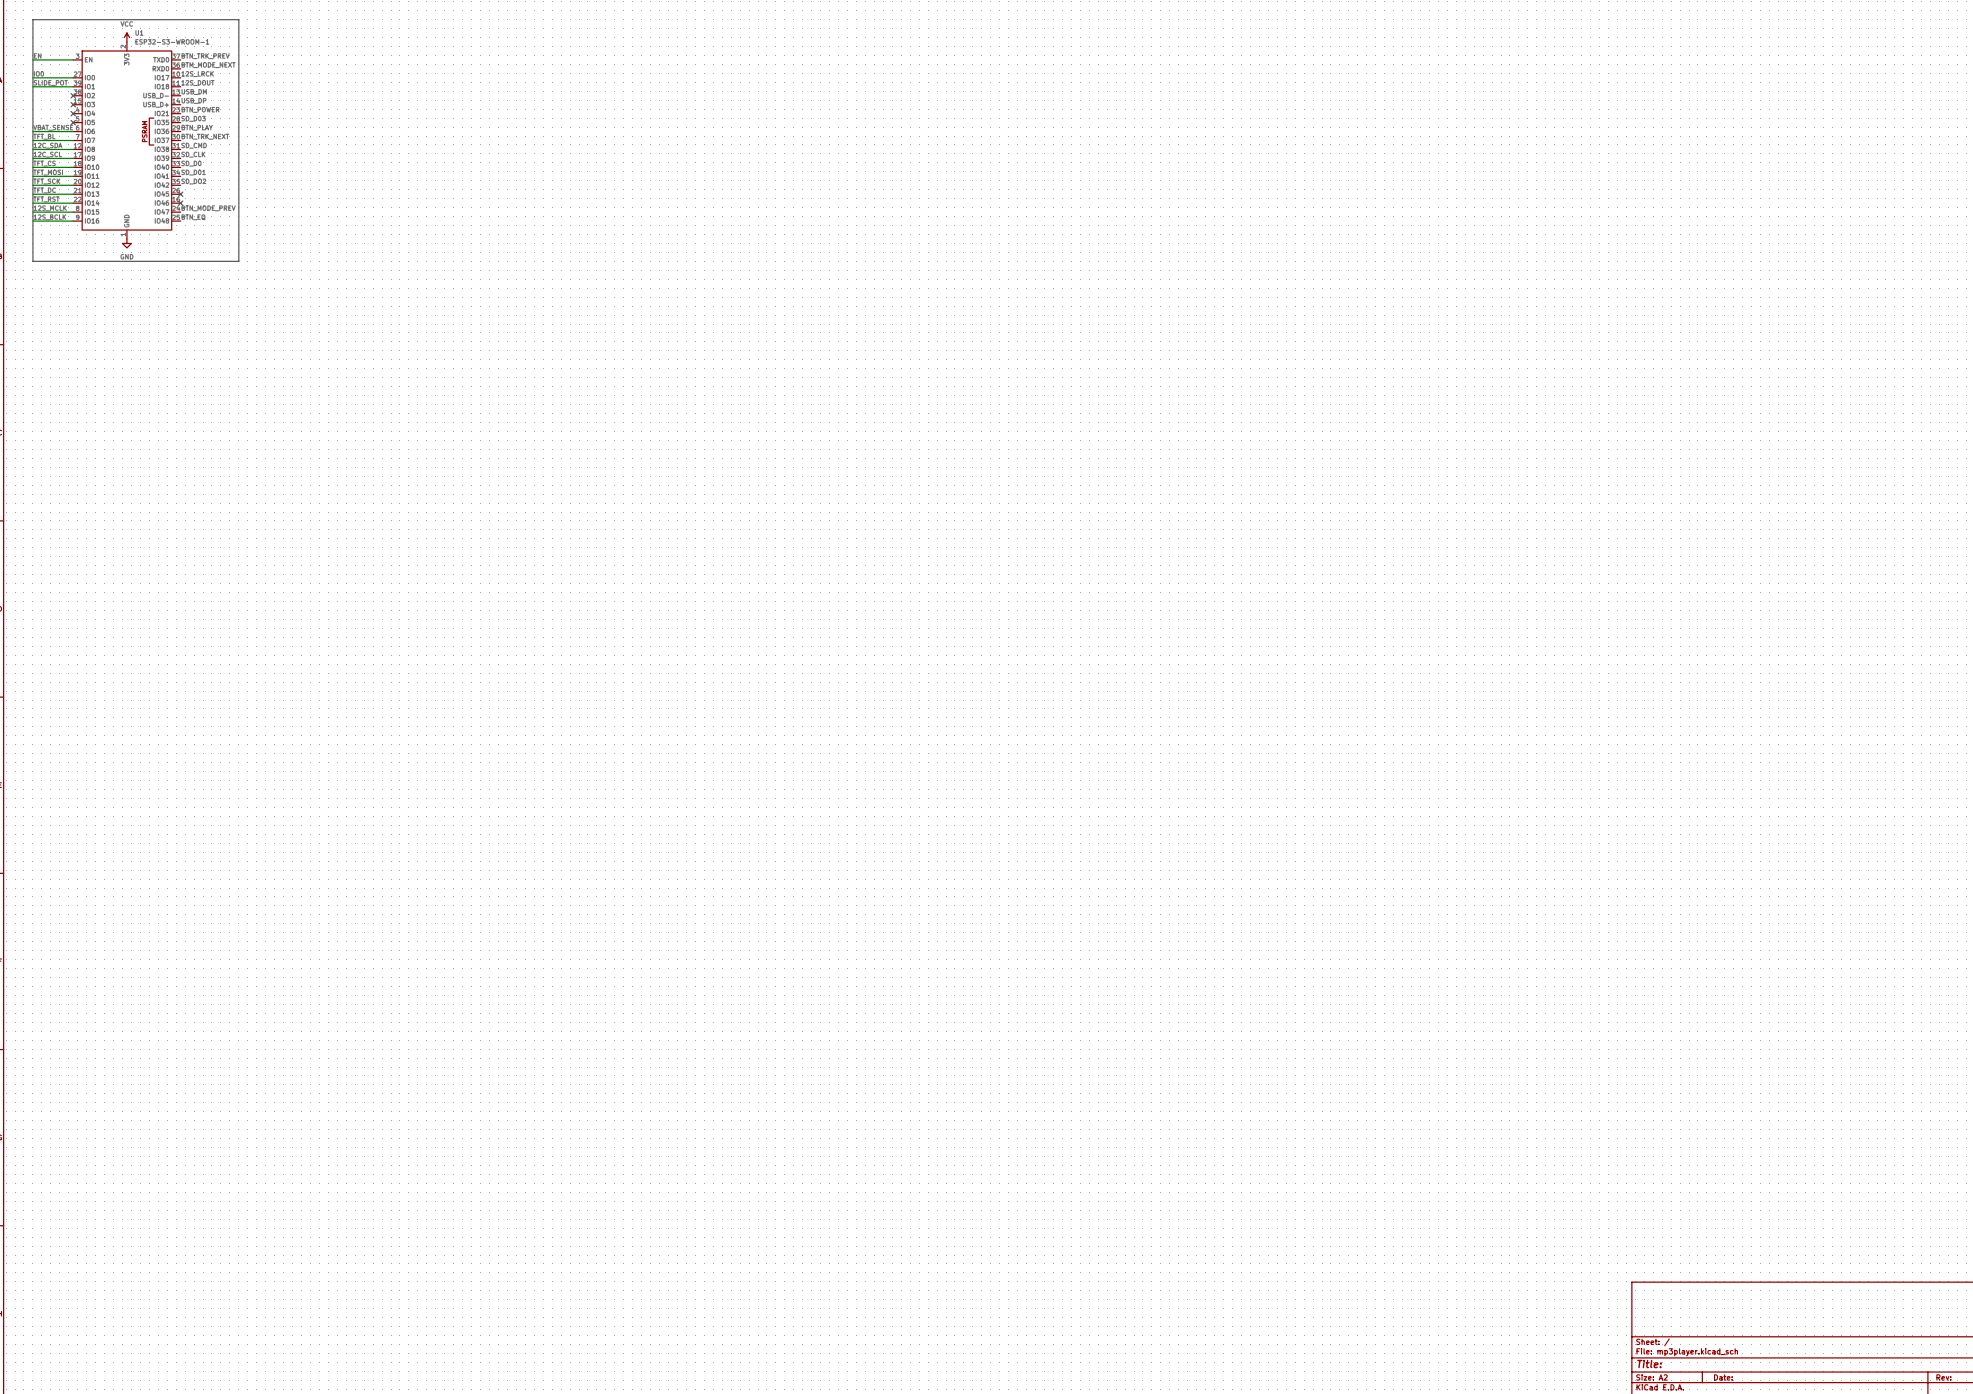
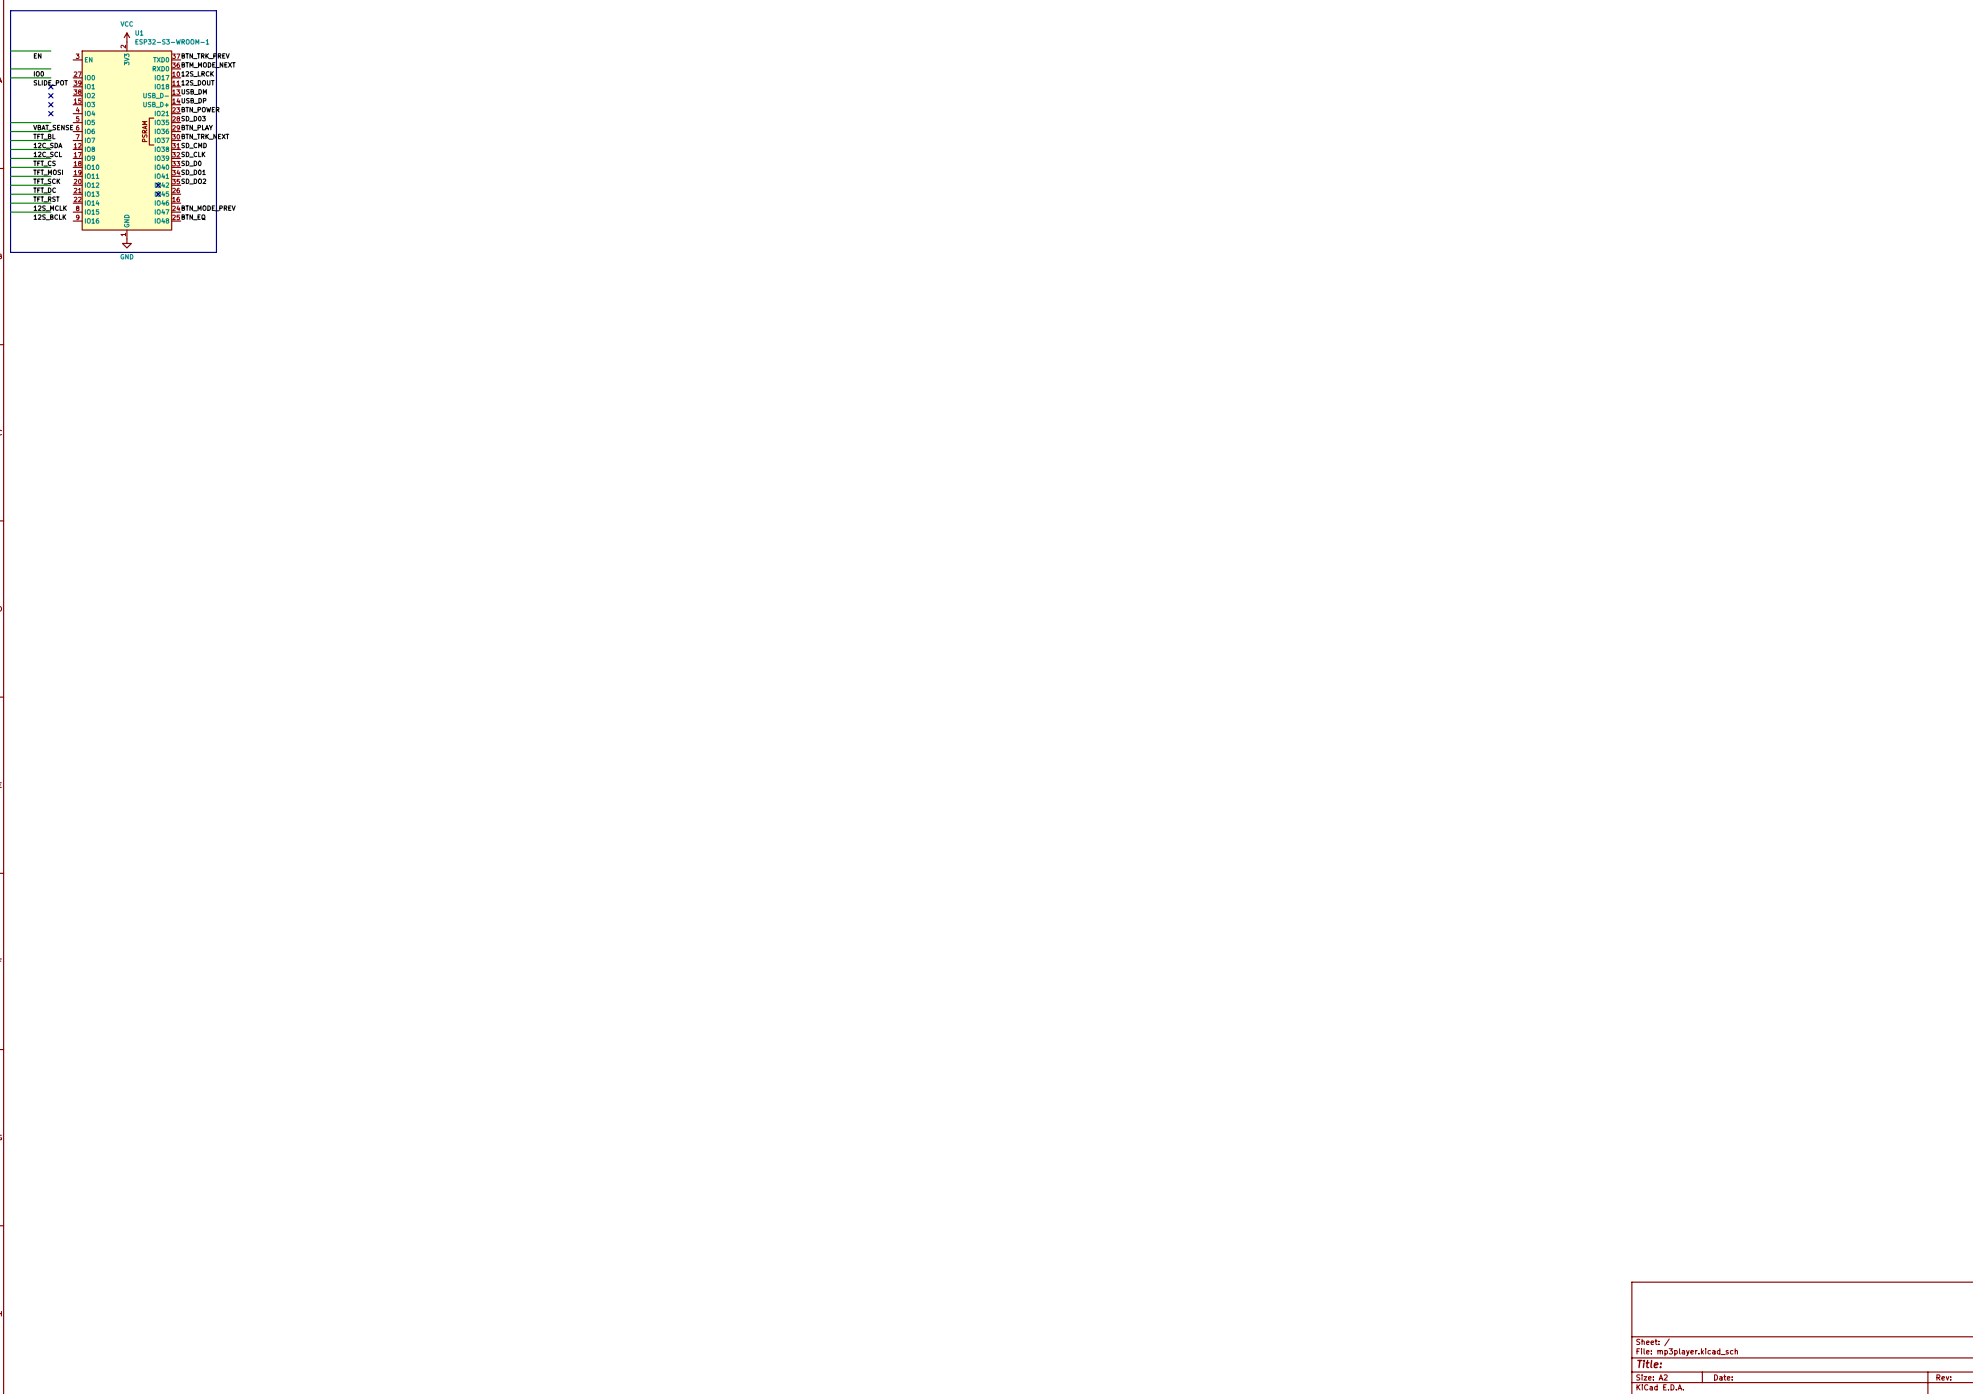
line: (32, 19) (238, 19) (238, 261) (32, 261) (32, 19) -> (10, 10) (216, 10) (216, 252) (10, 252) (10, 10)
wire: (32, 59) (73, 59) -> (10, 51) (50, 51)
wire: (50, 77) (73, 77) -> (10, 77) (32, 77)
wire: (32, 86) (73, 86) -> (10, 68) (50, 68)
no-connect mark: none -> (50, 86)
no-connect mark: none -> (50, 95)
no-connect mark: (73, 95) -> none
no-connect mark: none -> (50, 104)
no-connect mark: (73, 104) -> none
no-connect mark: none -> (50, 113)
no-connect mark: (73, 113) -> none
wire: none -> (10, 122) (50, 122)
no-connect mark: (73, 122) -> none
wire: (50, 131) (73, 131) -> (10, 131) (32, 131)
wire: (50, 140) (73, 140) -> (10, 140) (32, 140)
wire: (50, 149) (73, 149) -> (10, 149) (32, 149)
wire: (50, 158) (73, 158) -> (10, 158) (32, 158)
wire: (50, 167) (73, 167) -> (10, 167) (32, 167)
wire: (50, 176) (73, 176) -> (10, 176) (32, 176)
wire: (50, 185) (73, 185) -> (10, 185) (32, 185)
no-connect mark: none -> (158, 185)
wire: (50, 194) (73, 194) -> (10, 194) (32, 194)
no-connect mark: none -> (158, 194)
no-connect mark: (180, 194) -> none
wire: (50, 203) (73, 203) -> (10, 203) (32, 203)
no-connect mark: (180, 203) -> none
wire: (50, 212) (73, 212) -> (10, 212) (32, 212)
wire: (32, 221) (73, 221) -> none

